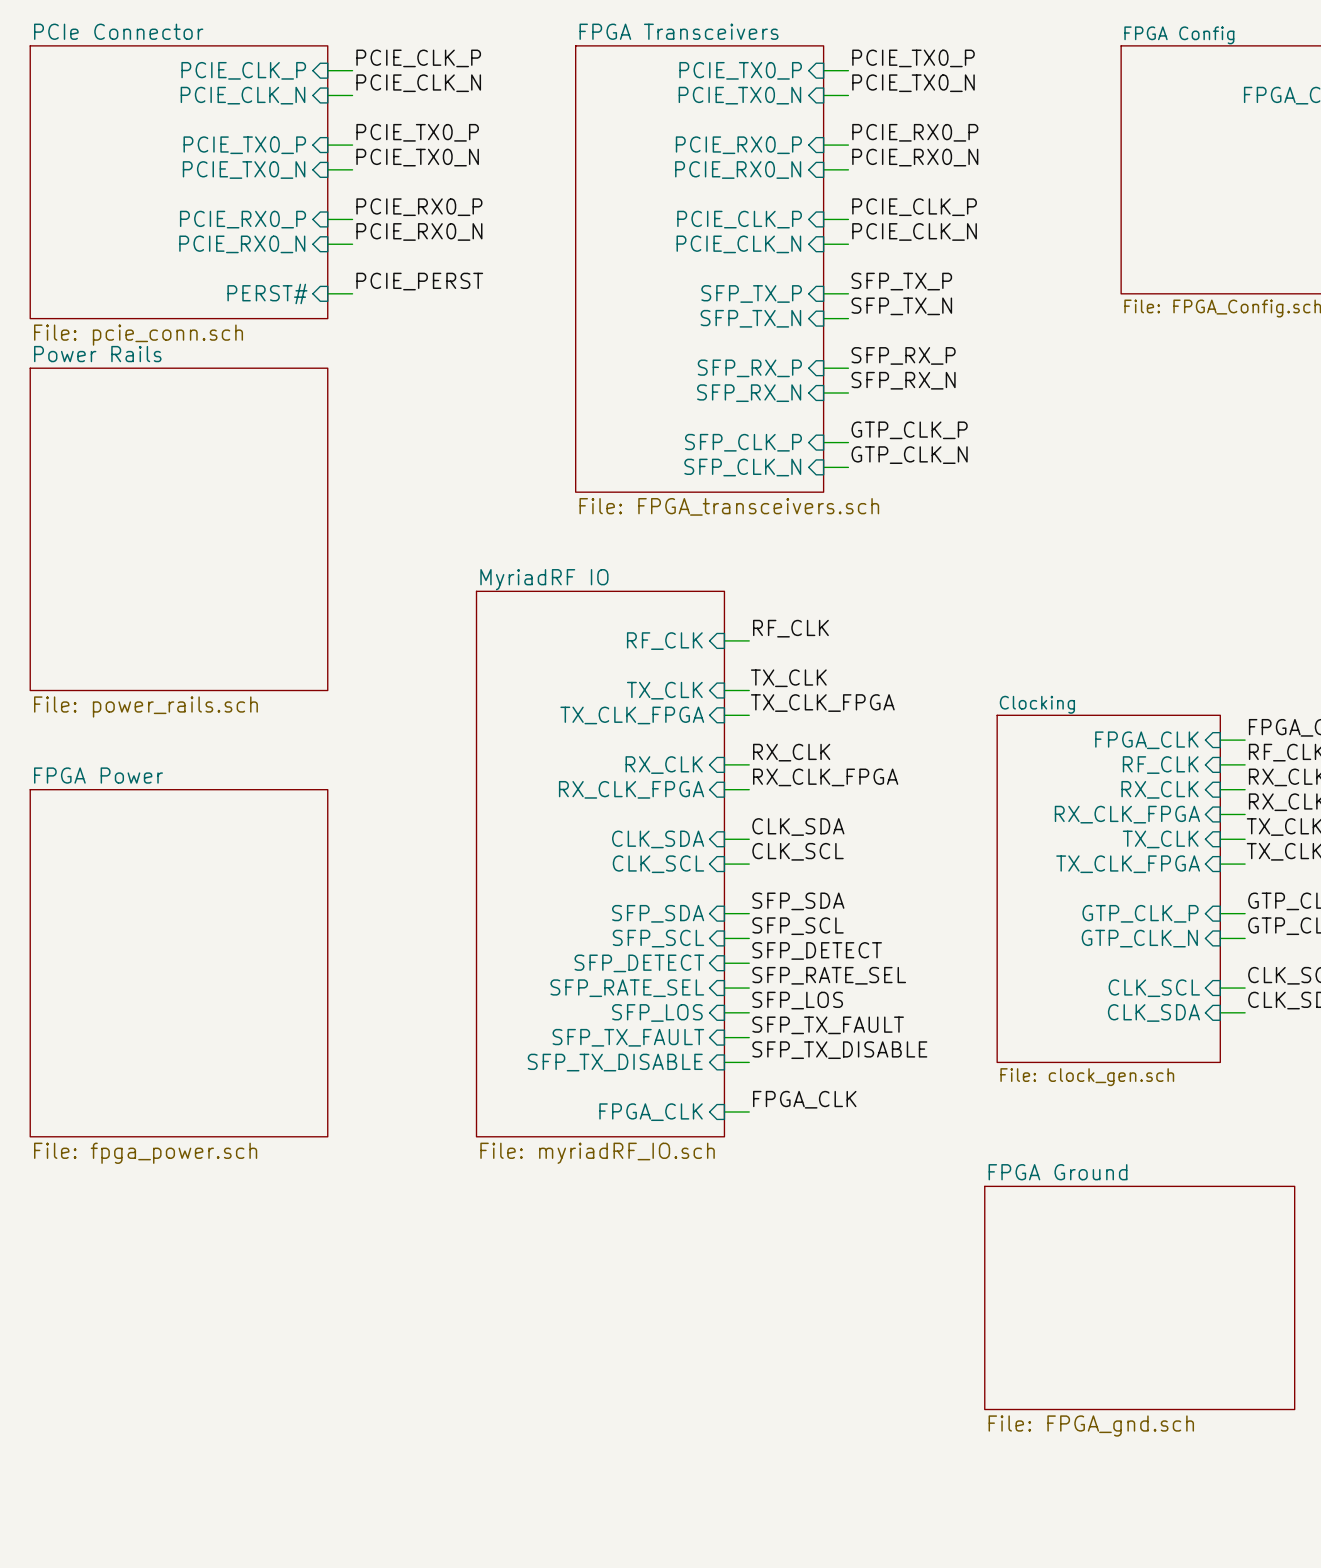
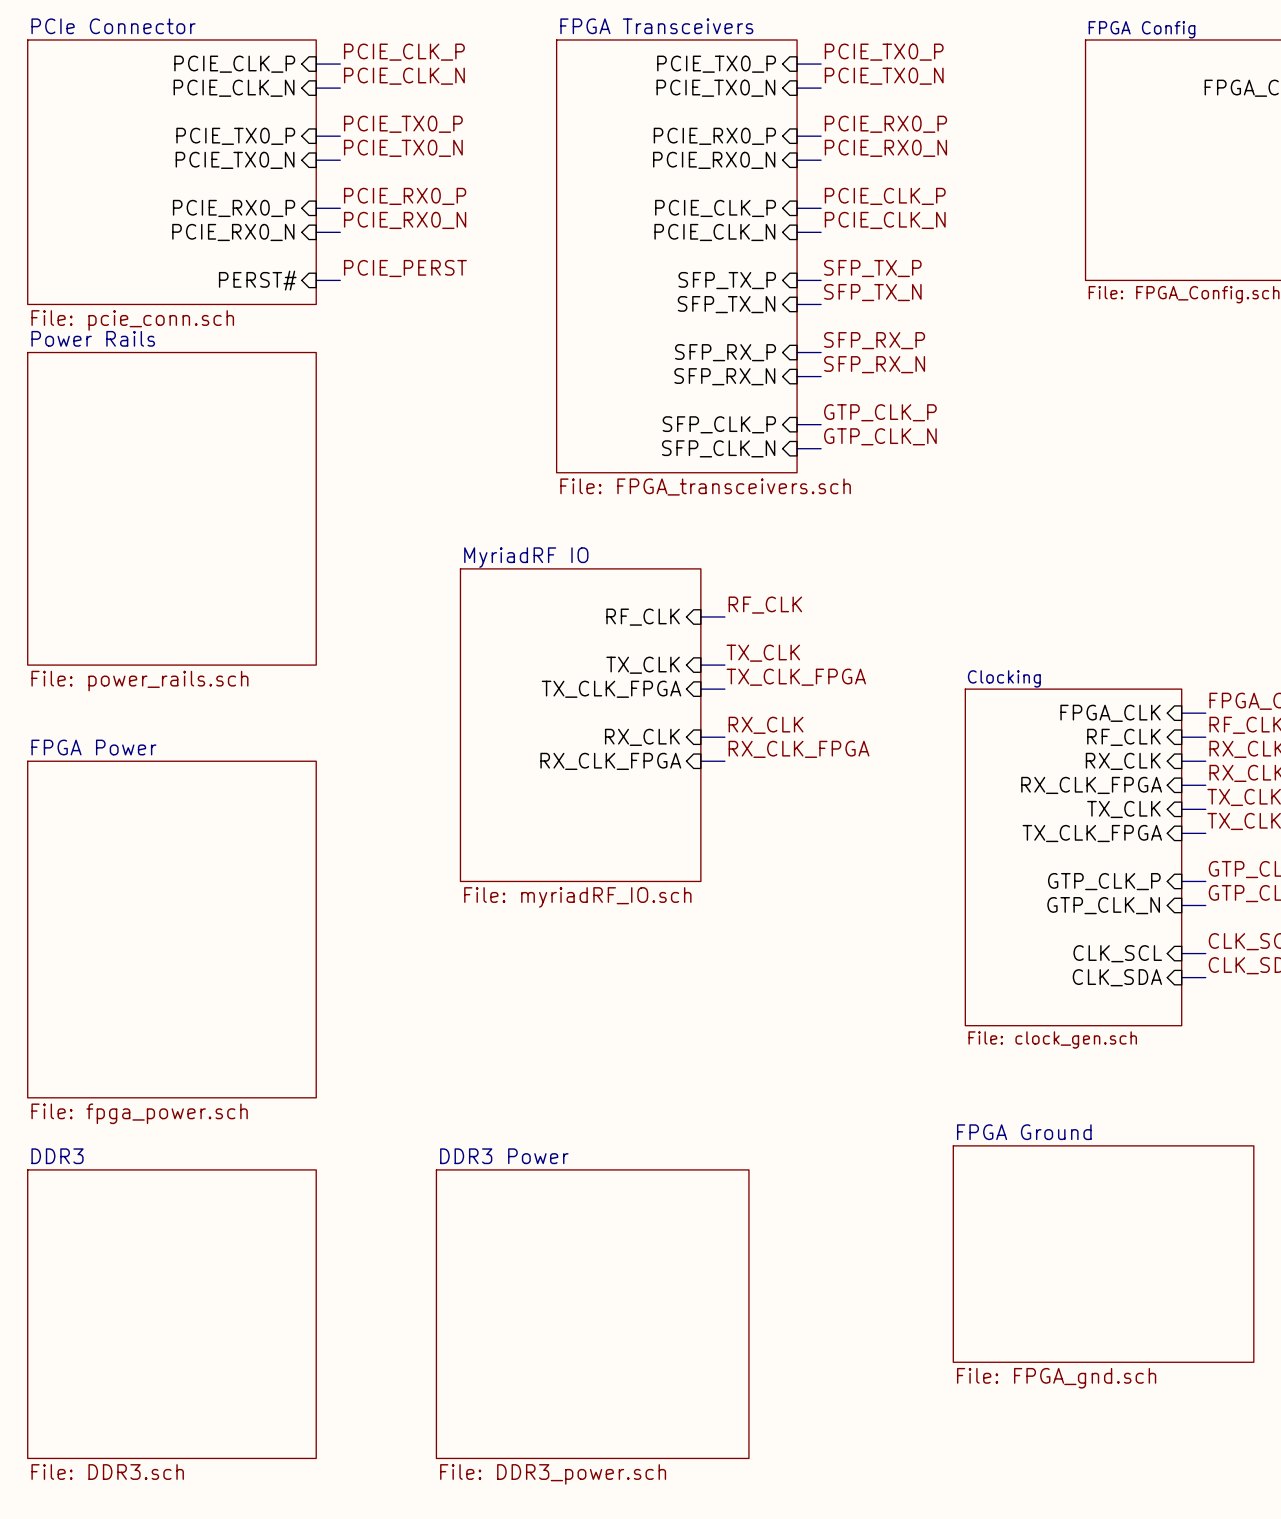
sheet MyriadRF IO: none -> File: myriadRF_IO.sch (580, 725)
label: CLK_SDA (798, 827) -> none
sheet pin: CLK_SDA (658, 839) -> none
wire: (724, 839) (749, 839) -> none
label: CLK_SCL (798, 851) -> none
sheet MyriadRF IO: File: myriadRF_IO.sch (600, 864) -> none
sheet pin: CLK_SCL (658, 864) -> none
wire: (724, 864) (749, 864) -> none
label: SFP_SDA (798, 901) -> none
sheet pin: SFP_SDA (658, 913) -> none
wire: (724, 913) (749, 913) -> none
label: SFP_SCL (798, 926) -> none
sheet pin: SFP_SCL (658, 938) -> none
wire: (724, 938) (749, 938) -> none
label: SFP_DETECT (817, 950) -> none
sheet pin: SFP_DETECT (639, 963) -> none
wire: (724, 963) (749, 963) -> none
label: SFP_RATE_SEL (829, 975) -> none
sheet pin: SFP_RATE_SEL (627, 988) -> none
wire: (724, 988) (749, 988) -> none
label: SFP_LOS (797, 1000) -> none
sheet pin: SFP_LOS (657, 1012) -> none
wire: (724, 1012) (749, 1012) -> none
label: SFP_TX_FAULT (828, 1025) -> none
sheet pin: SFP_TX_FAULT (628, 1037) -> none
wire: (724, 1037) (749, 1037) -> none
label: SFP_TX_DISABLE (839, 1050) -> none
sheet pin: SFP_TX_DISABLE (615, 1062) -> none
wire: (724, 1062) (749, 1062) -> none
label: FPGA_CLK (804, 1099) -> none
wire: (724, 1111) (749, 1111) -> none
sheet pin: FPGA_CLK (651, 1112) -> none
sheet DDR3: none -> File: DDR3.sch (171, 1314)
sheet DDR3 Power: none -> File: DDR3_power.sch (592, 1314)

